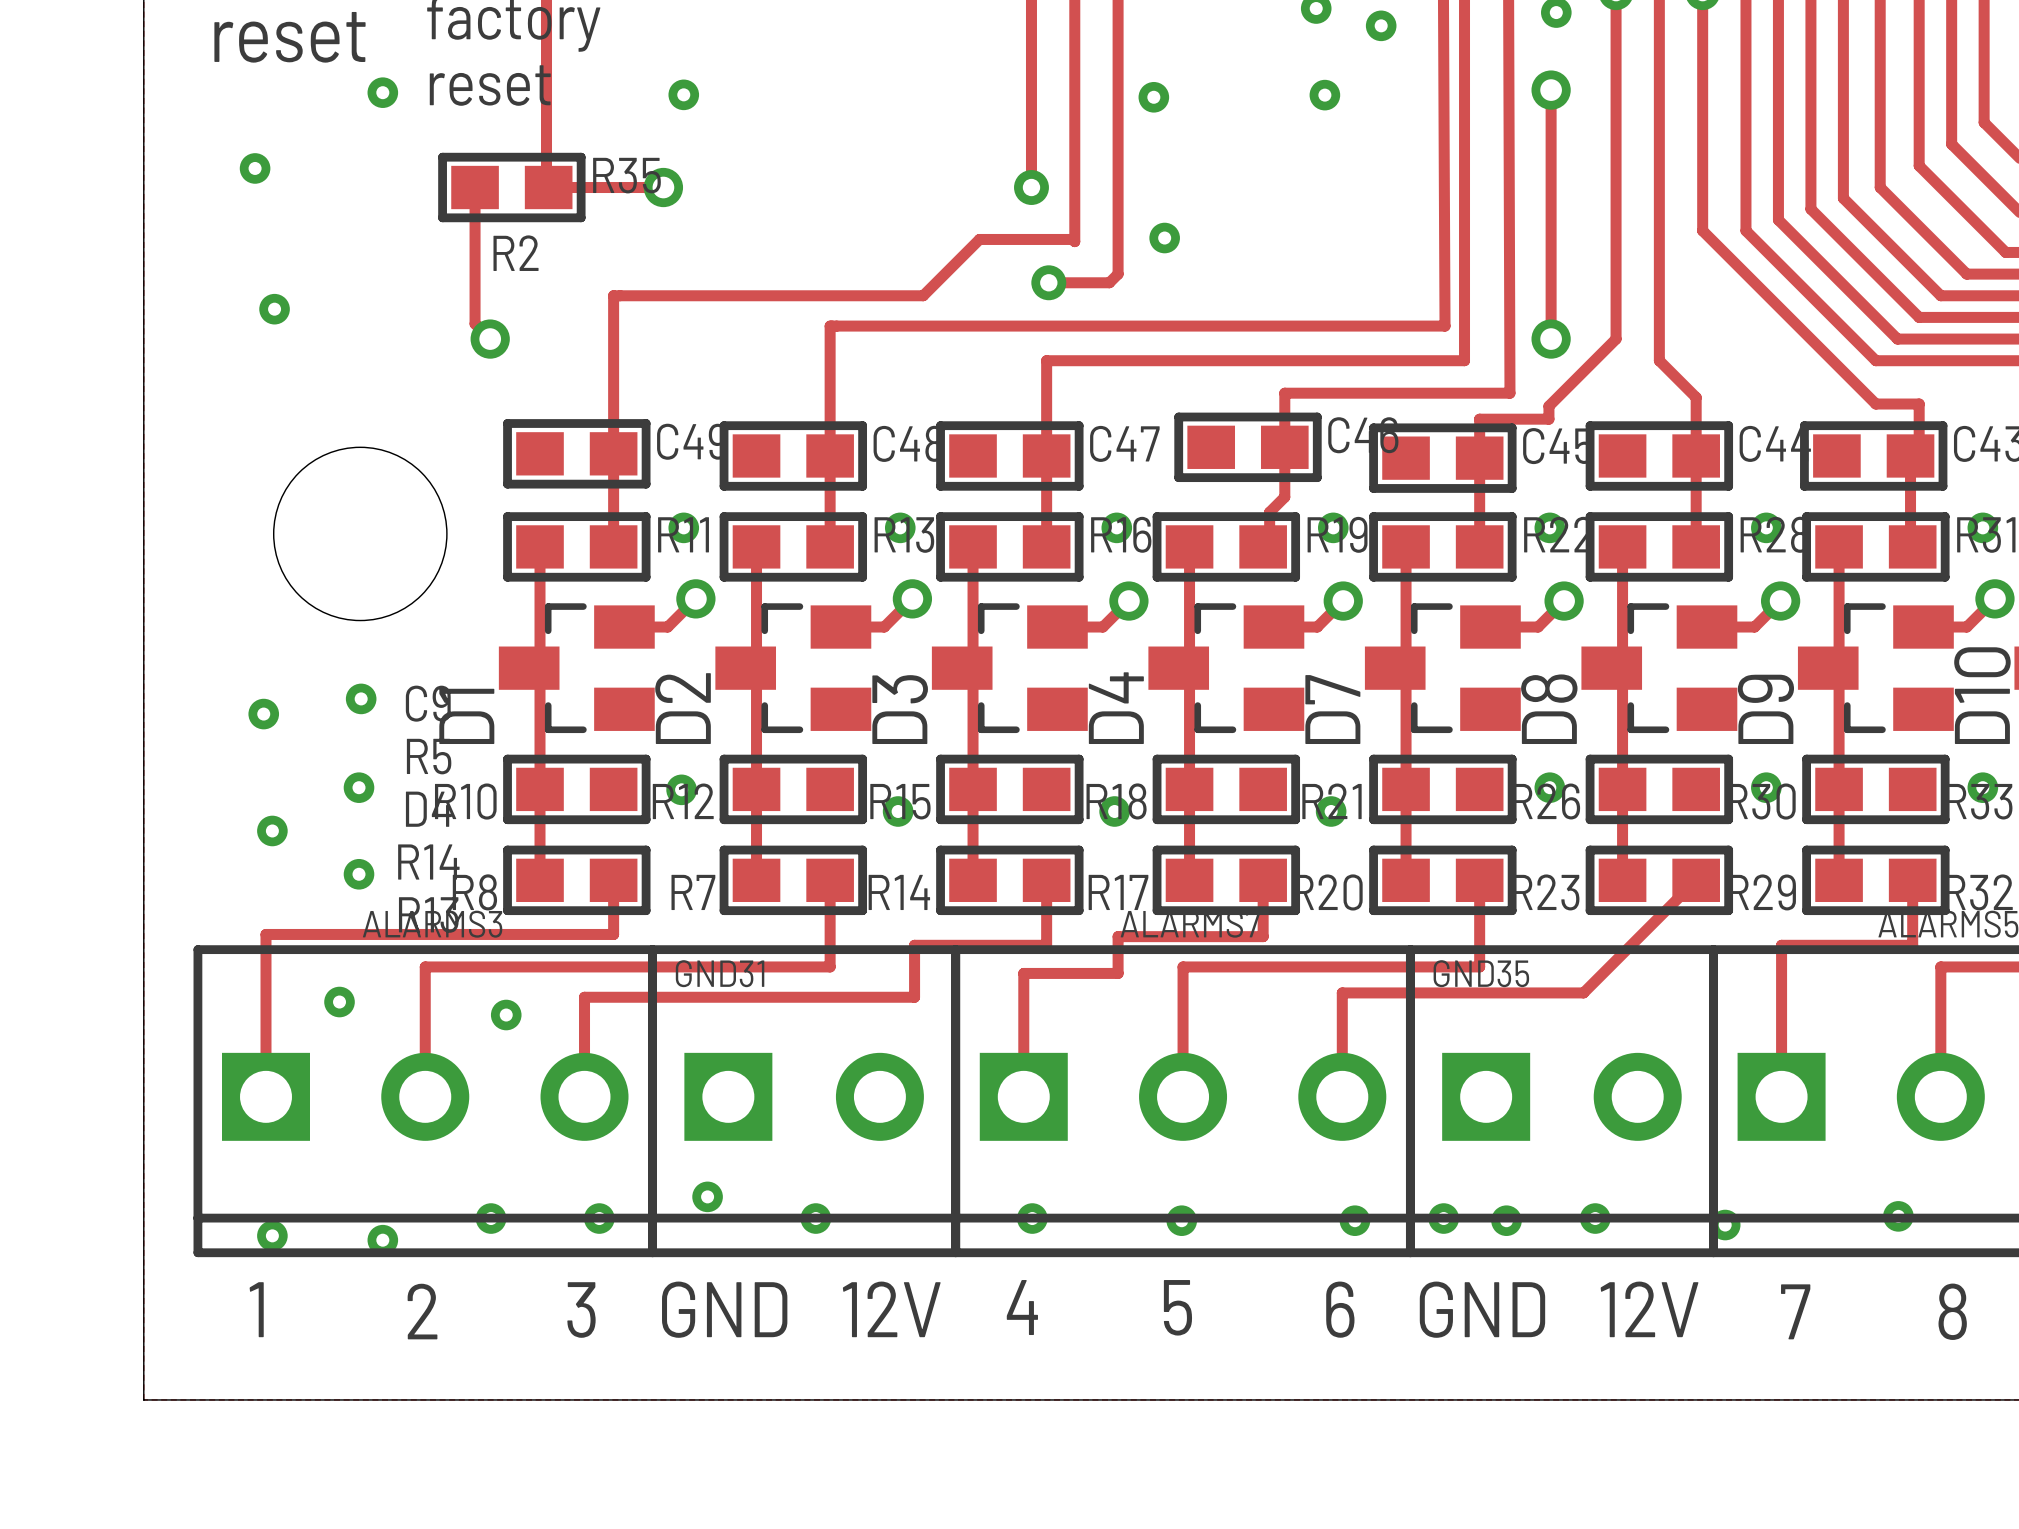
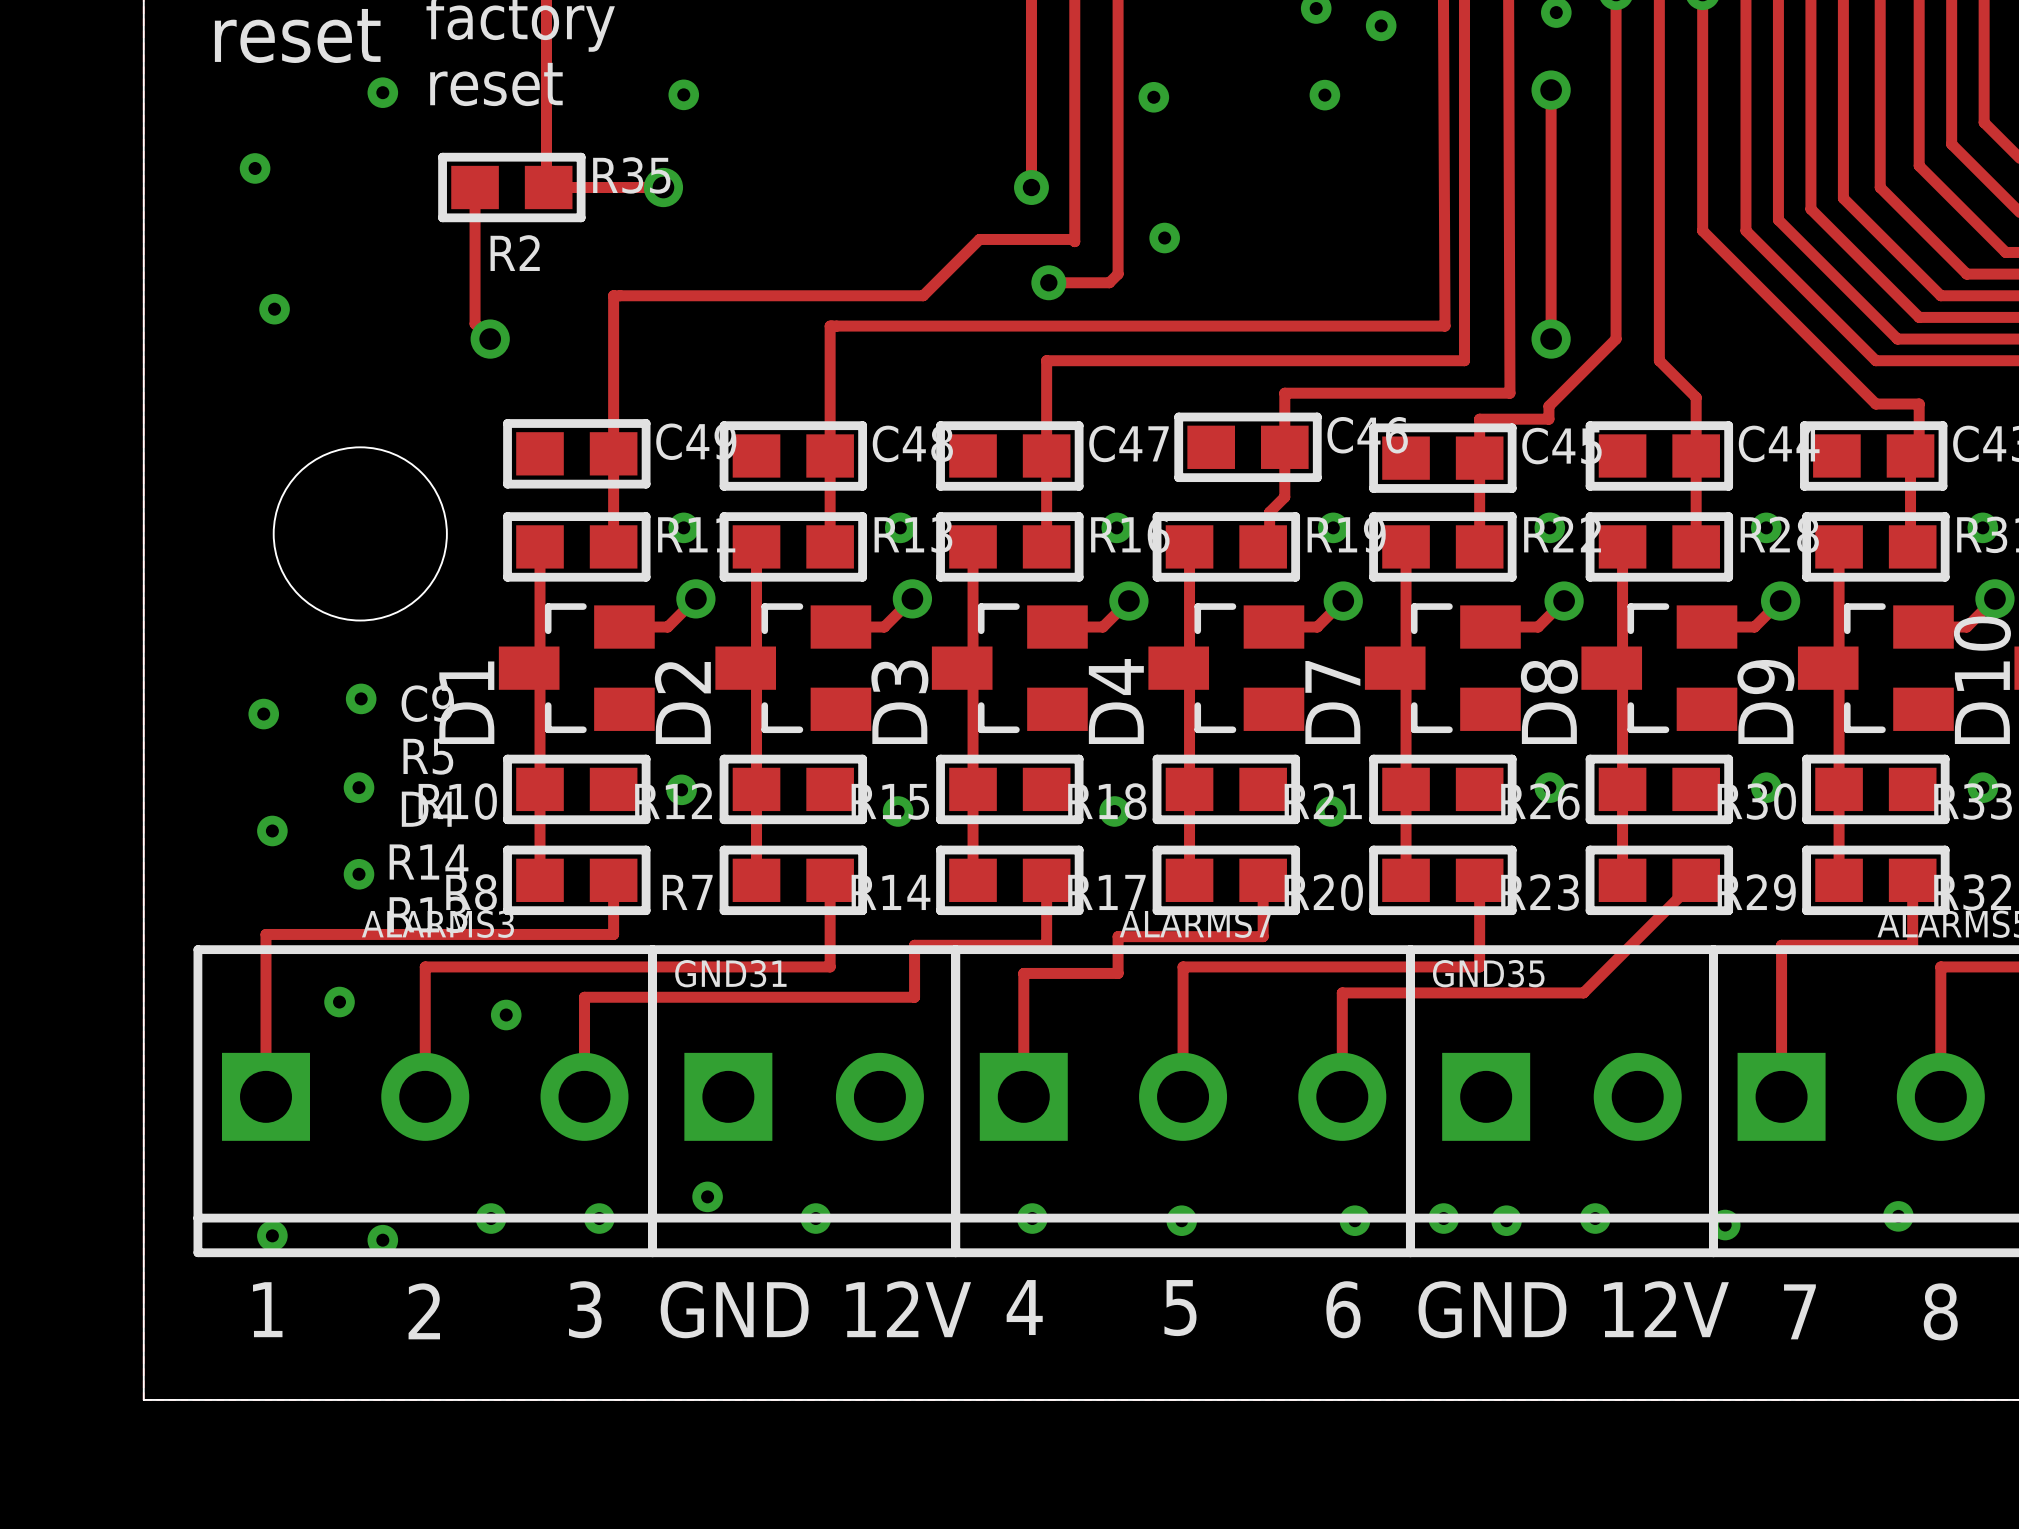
text position: 8 (1952, 1311) -> 8 (1940, 1311)

